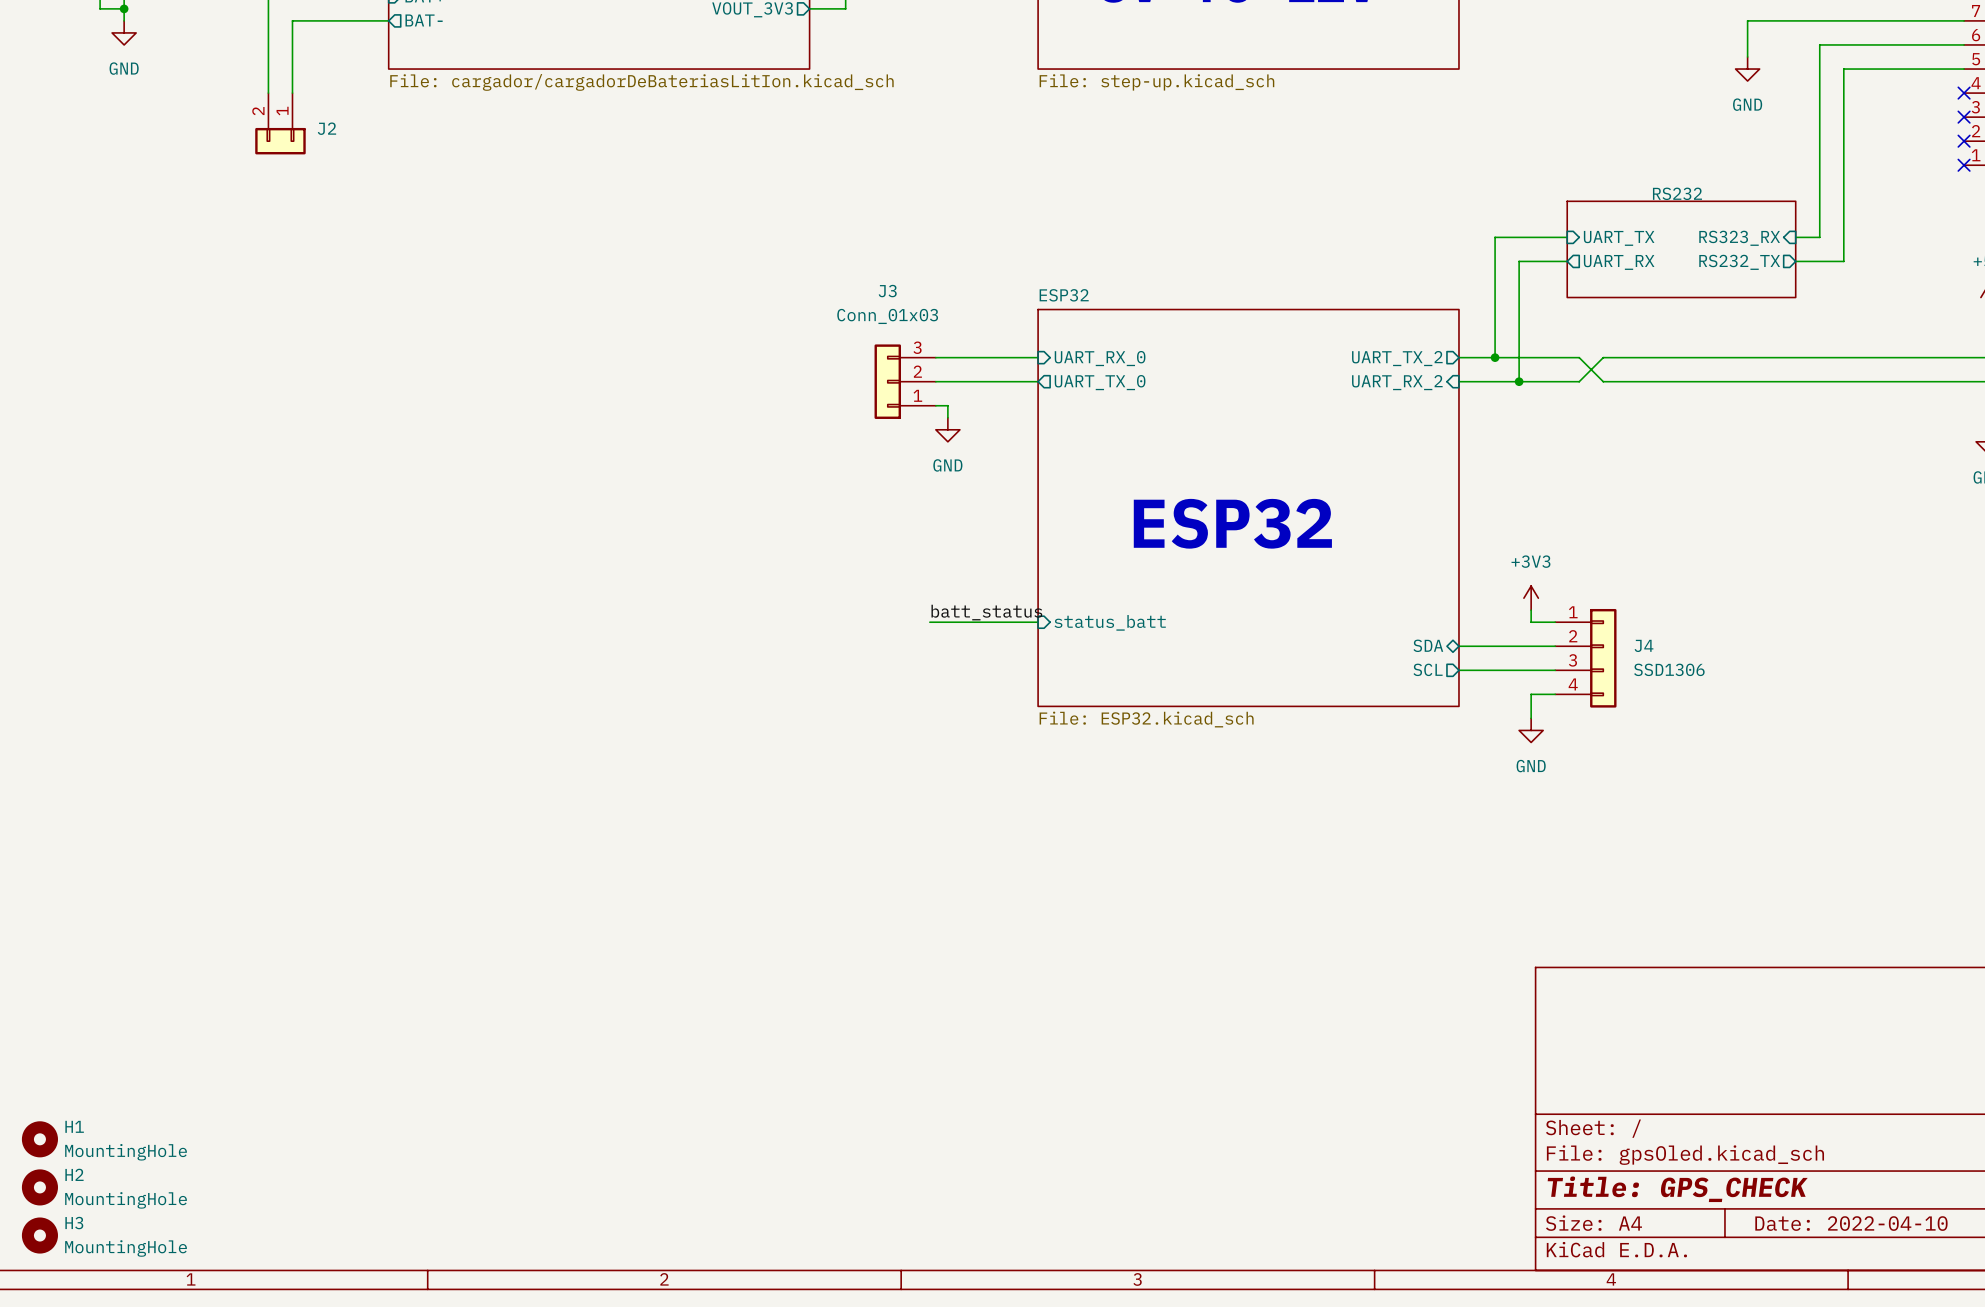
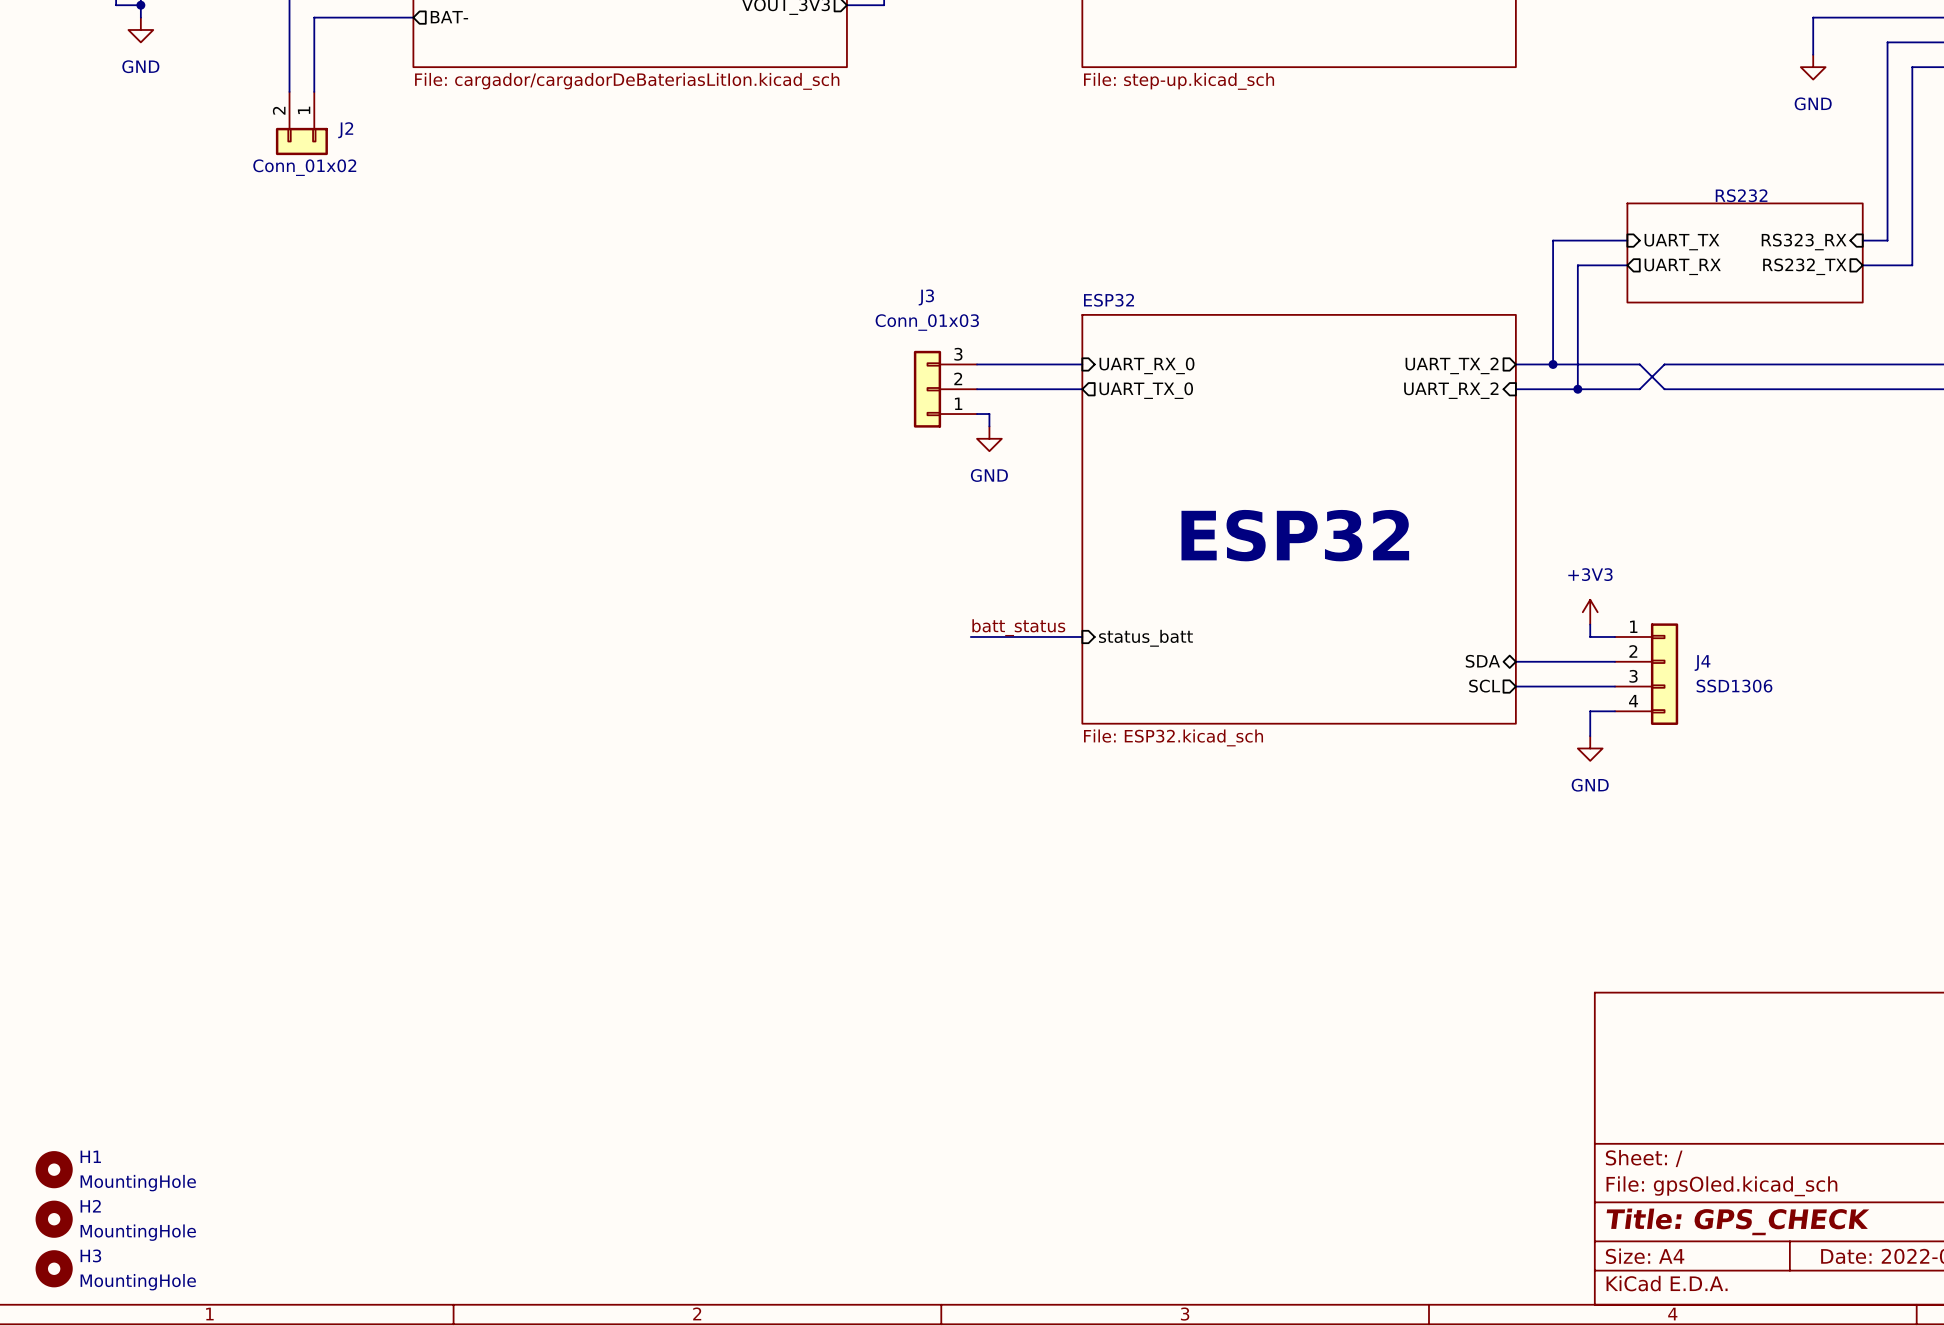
J2 value: none -> Conn_01x02 (304, 167)

